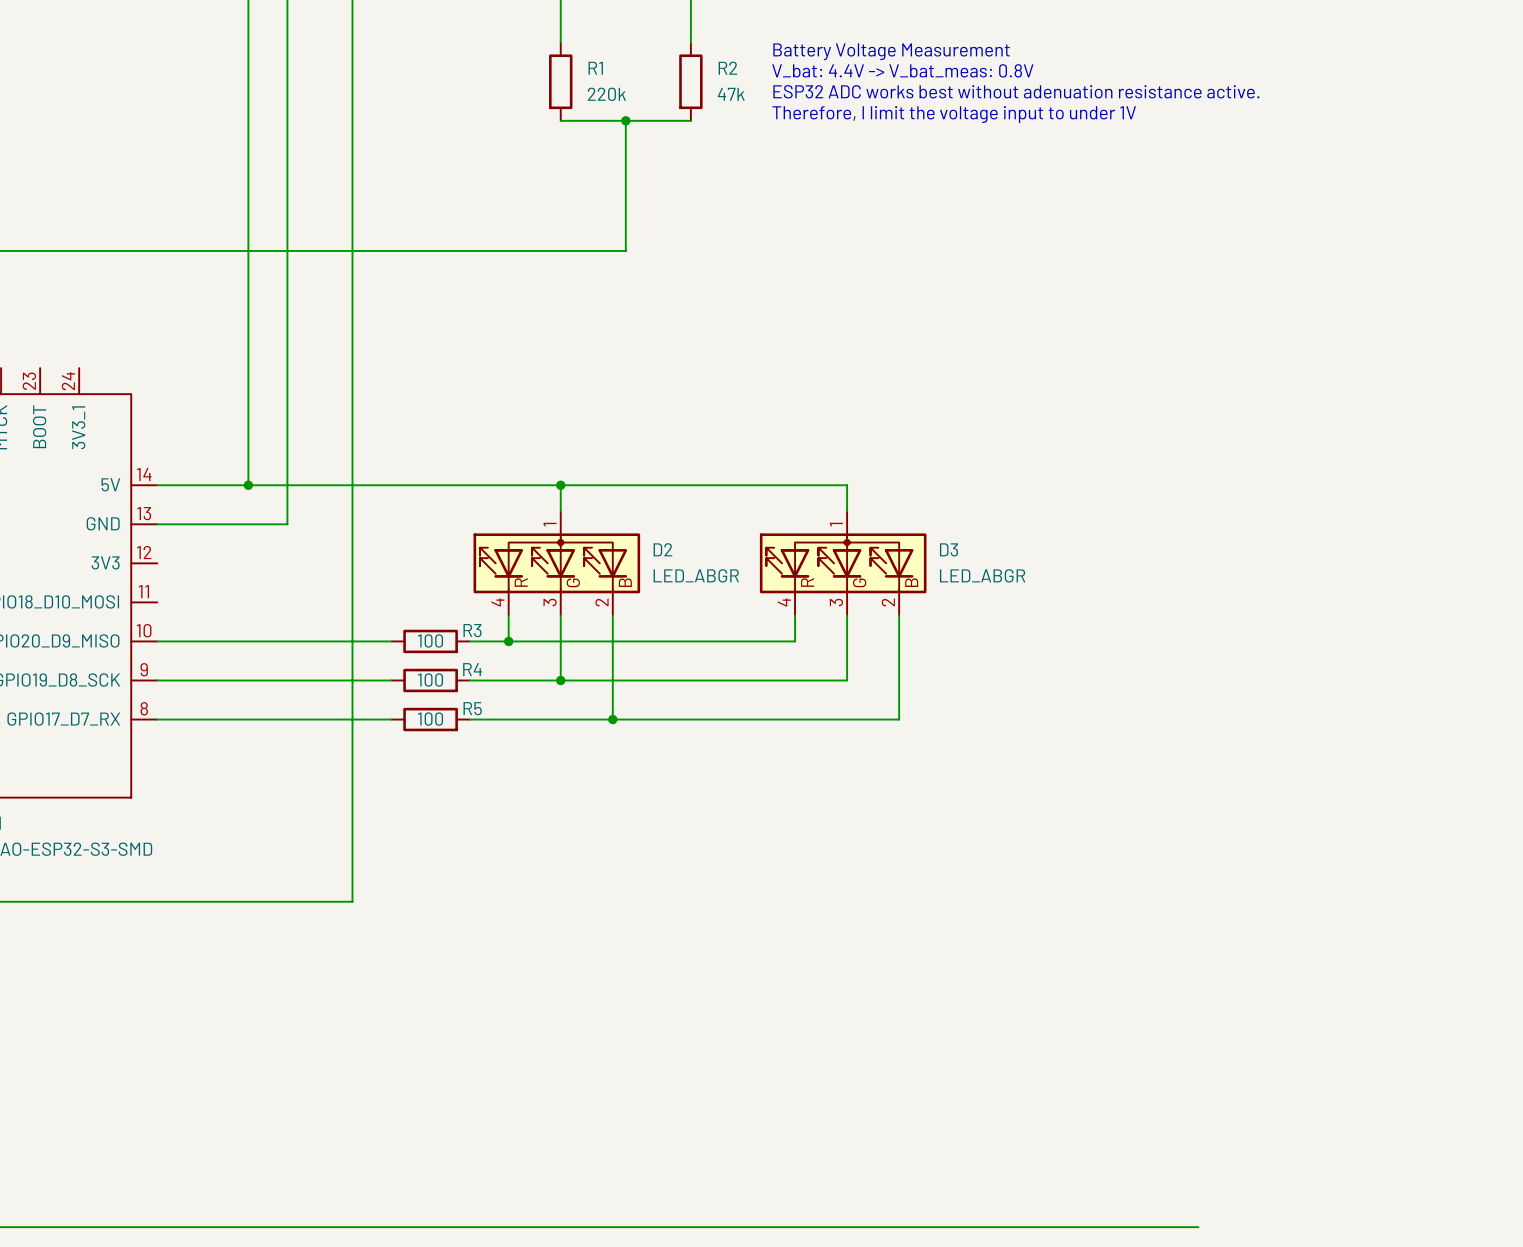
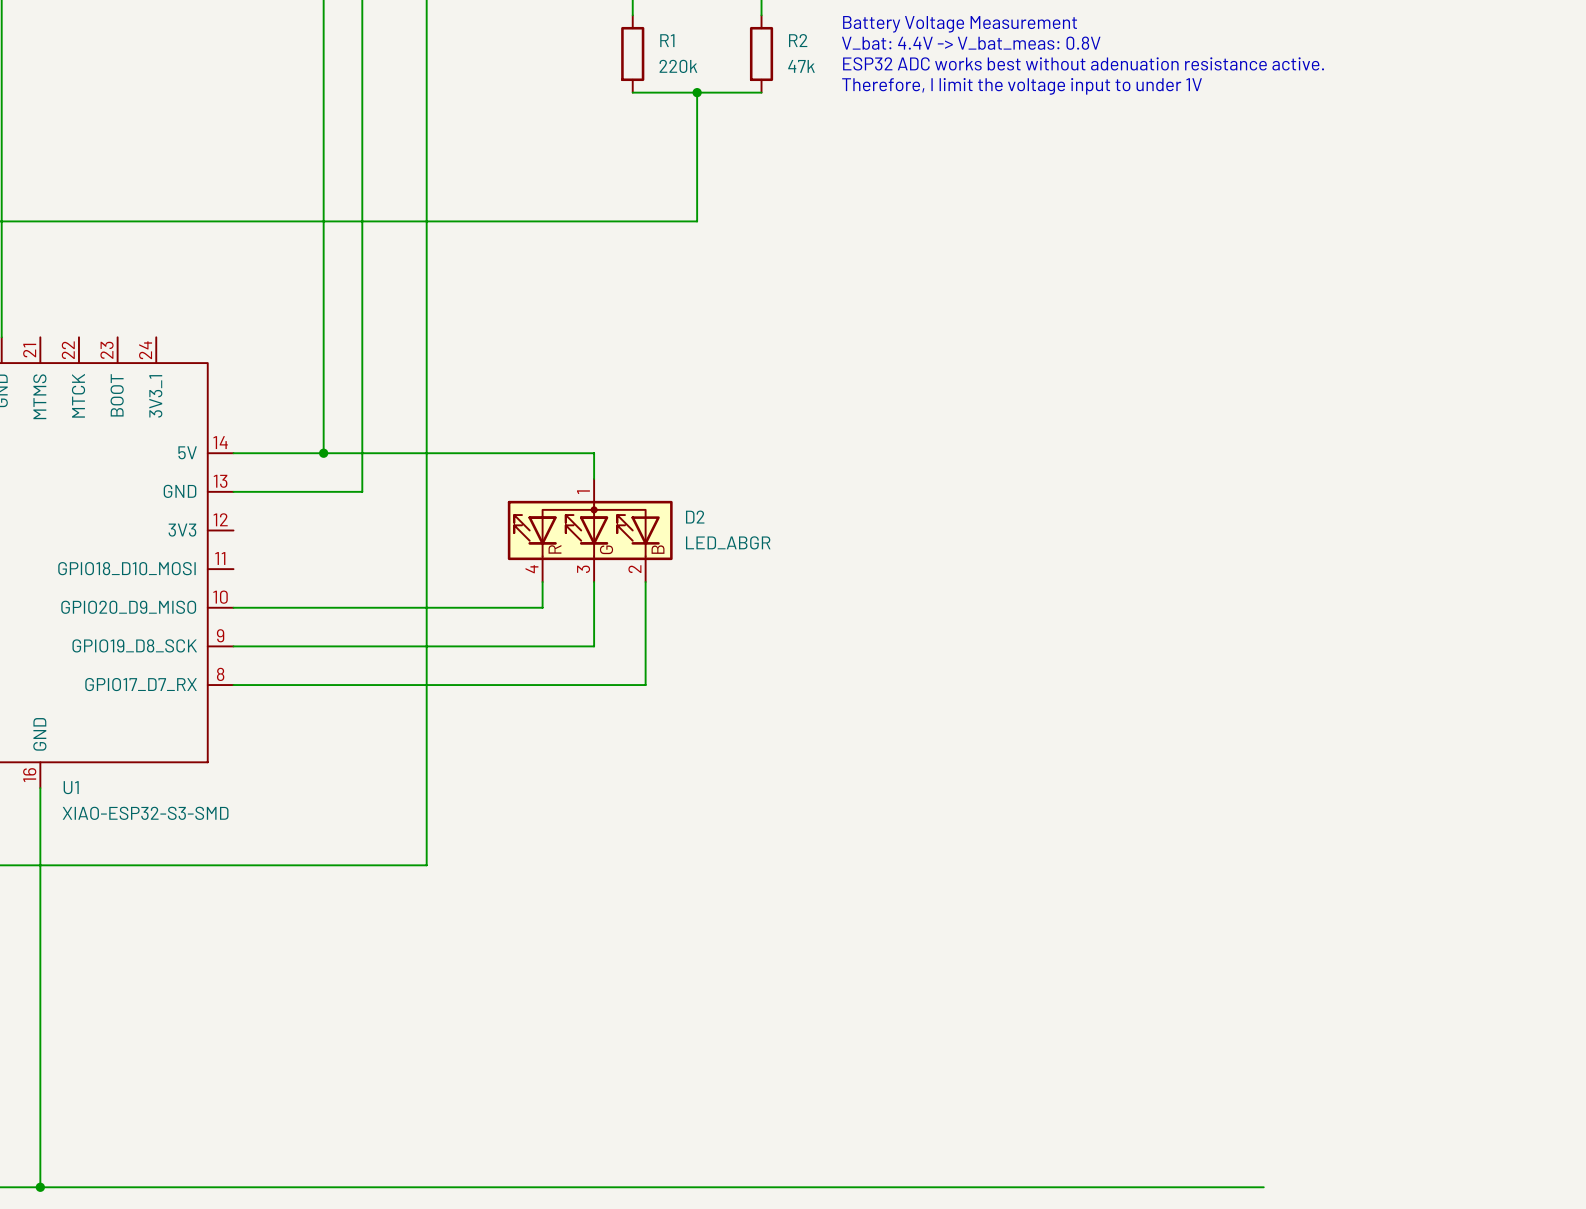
wire: (521, 485) (847, 485) (847, 511) -> (594, 453) (594, 478)
wire: (560, 485) (560, 511) -> none
junction: (560, 485) -> none
D2 position: (556, 563) -> (590, 530)
D3: LED_ABGR (843, 563) -> none
wire: none -> (542, 582) (542, 607) (465, 607)
wire: (508, 615) (508, 641) -> none
wire: (560, 615) (560, 680) -> none
wire: (612, 615) (612, 719) -> none
wire: (795, 615) (795, 641) (469, 641) -> none
wire: (847, 615) (847, 680) (521, 680) -> (594, 582) (594, 646)
wire: (899, 615) (899, 719) (573, 719) -> (645, 582) (645, 685)
R3: 100 (430, 641) -> none
junction: (508, 641) -> none
wire: none -> (465, 646) (542, 646)
R4: 100 (430, 680) -> none
junction: (560, 680) -> none
wire: none -> (465, 685) (542, 685)
R5: 100 (430, 719) -> none
junction: (612, 719) -> none

